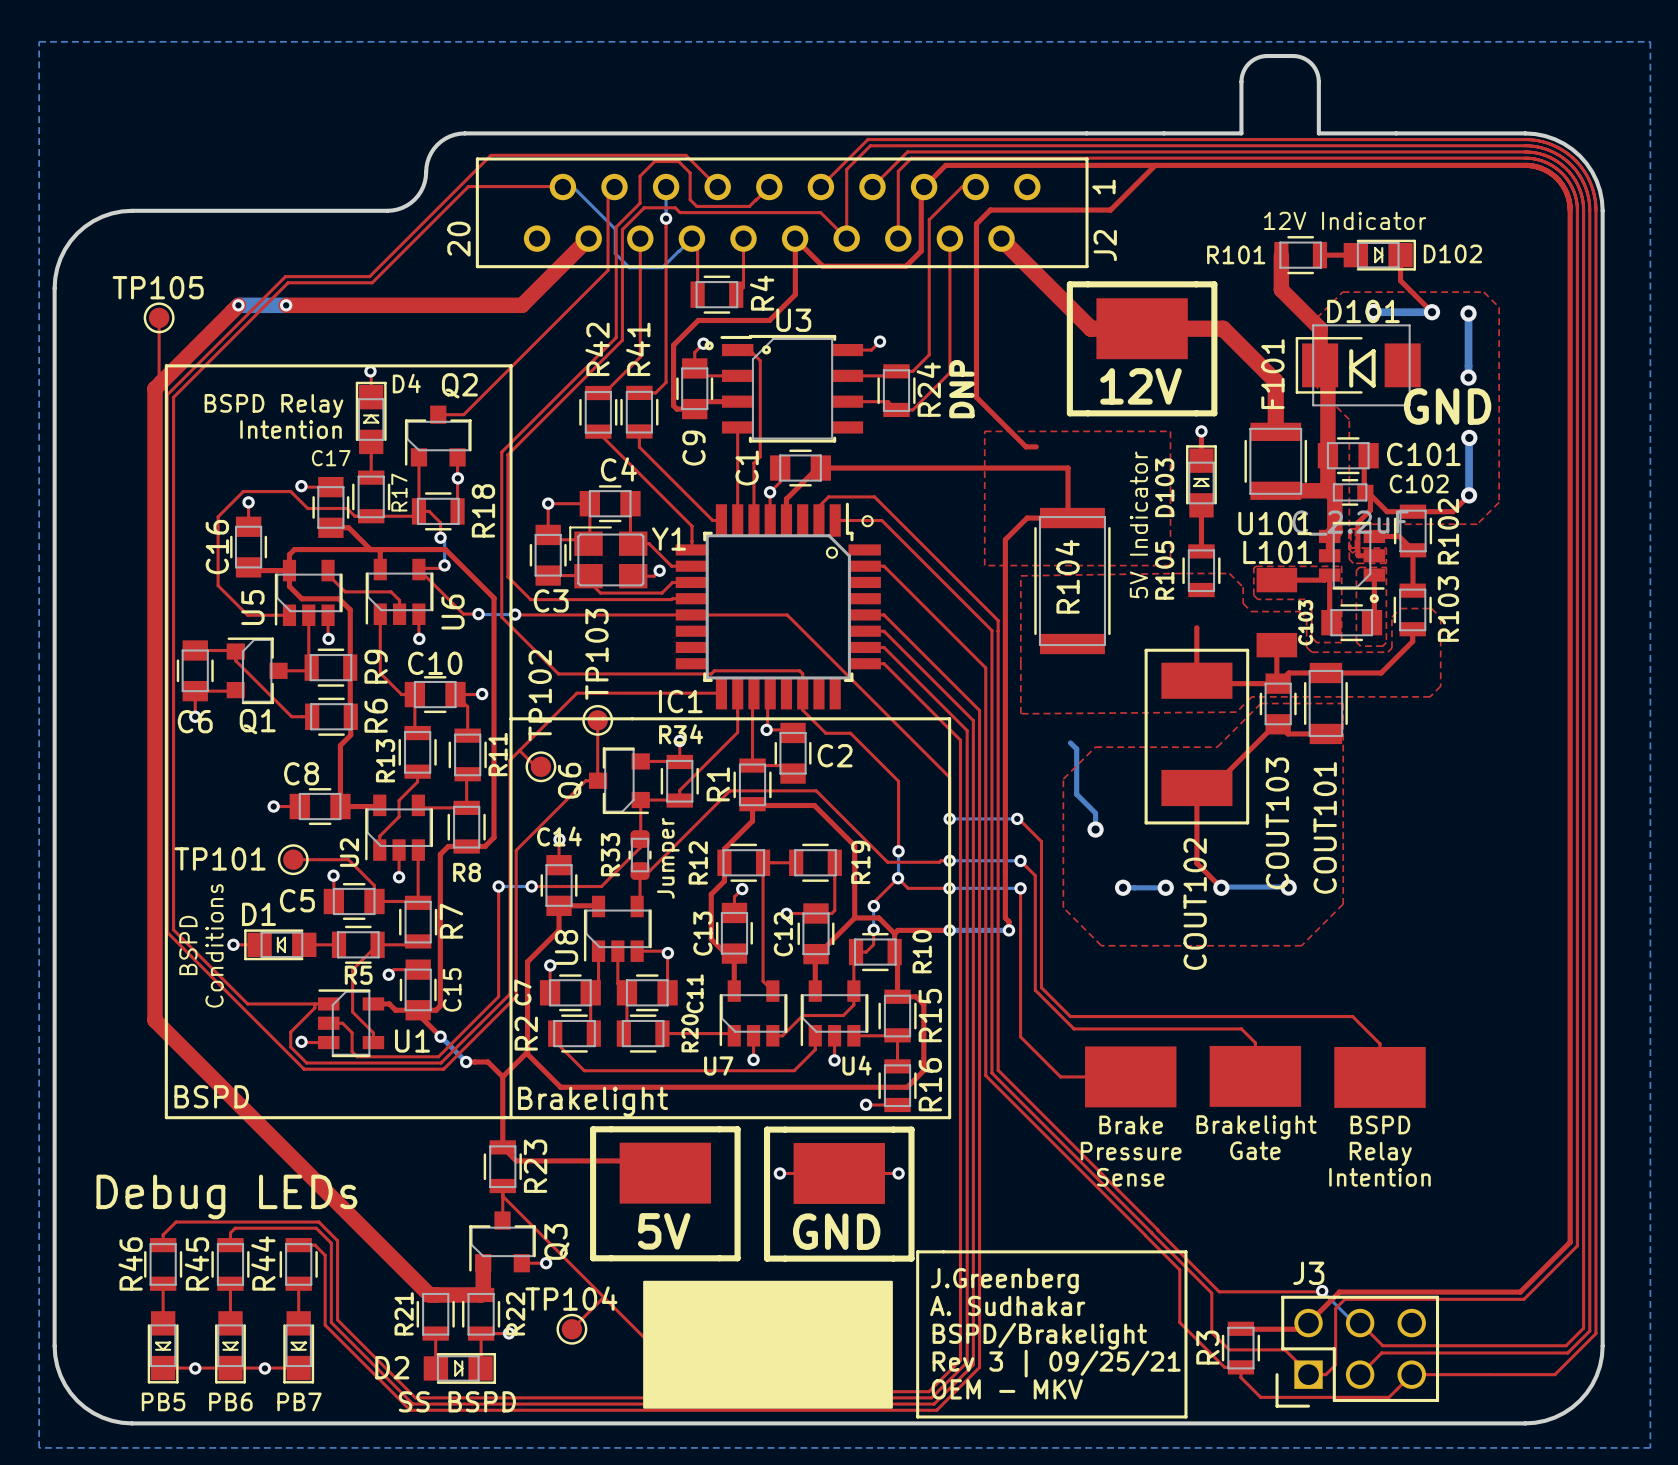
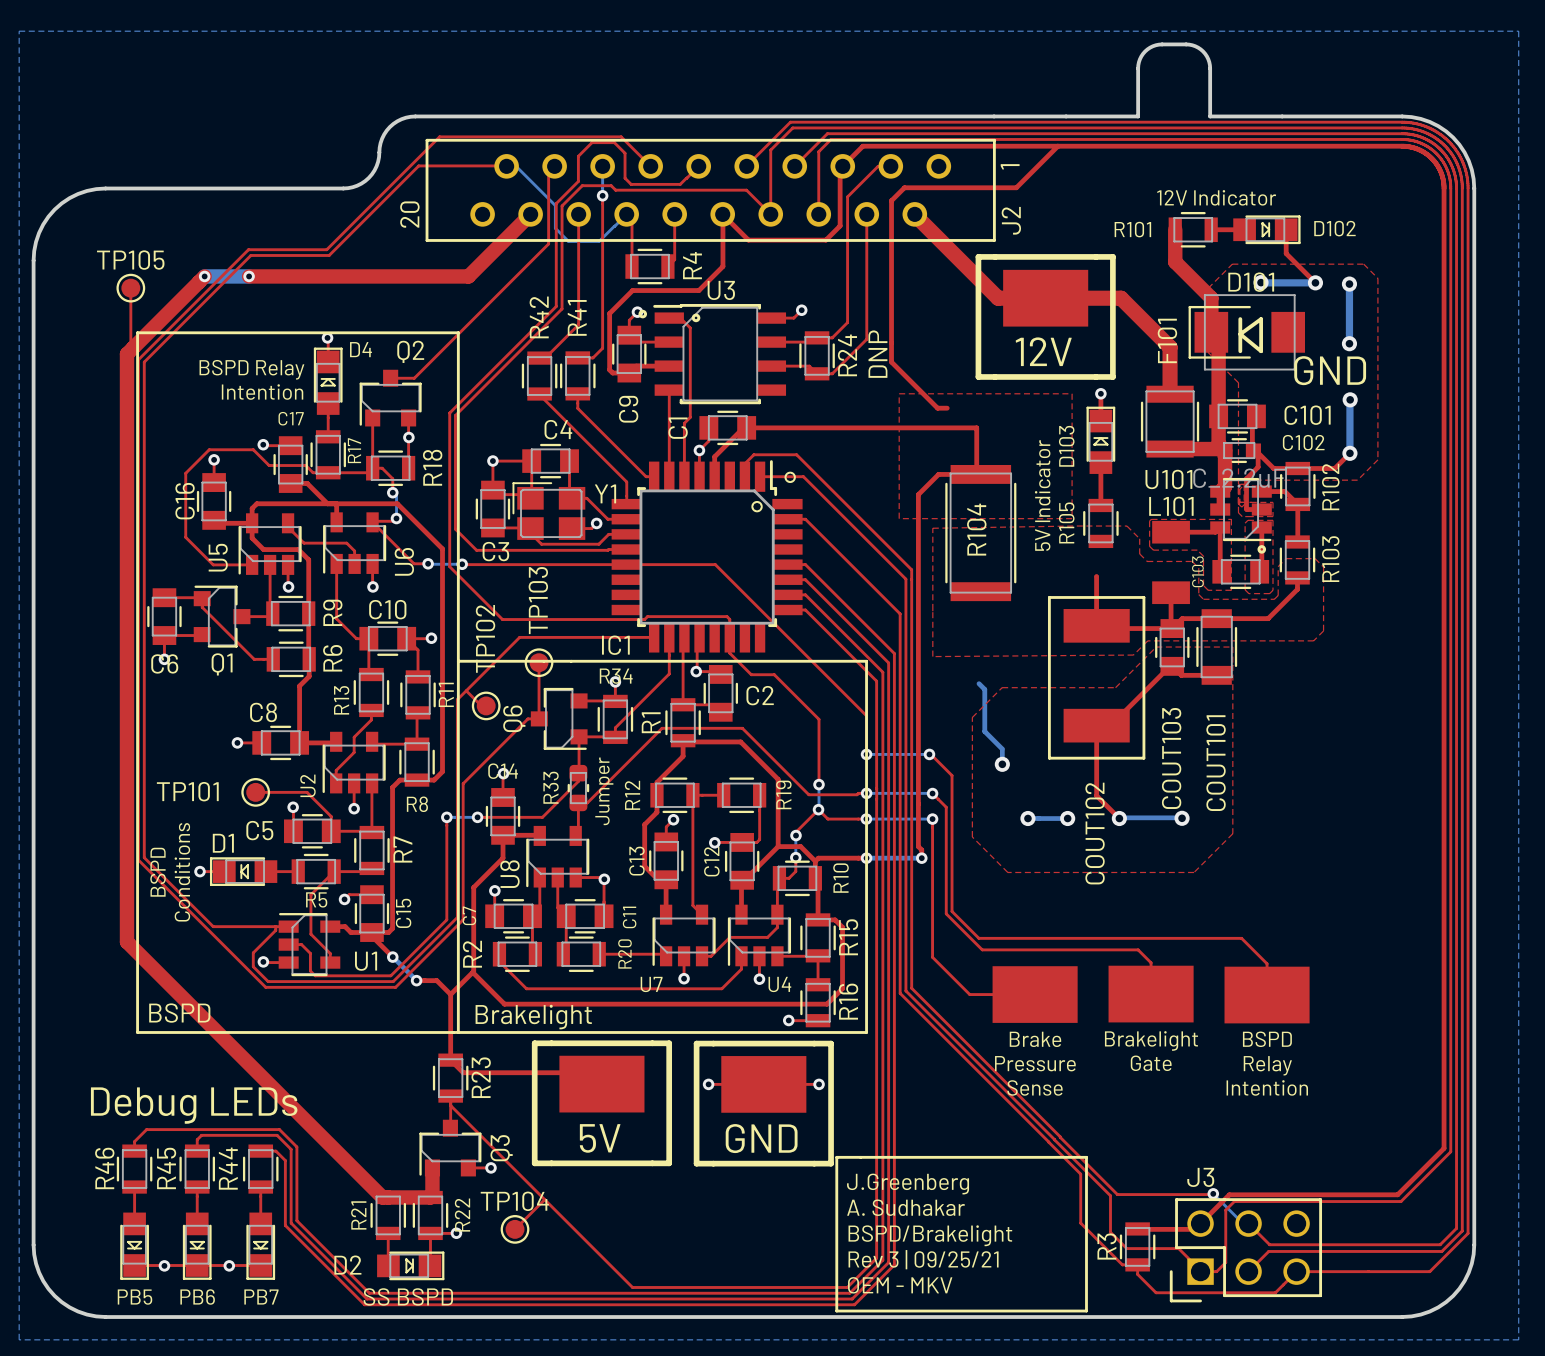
drawing: [643, 1280, 893, 1409] -> none

